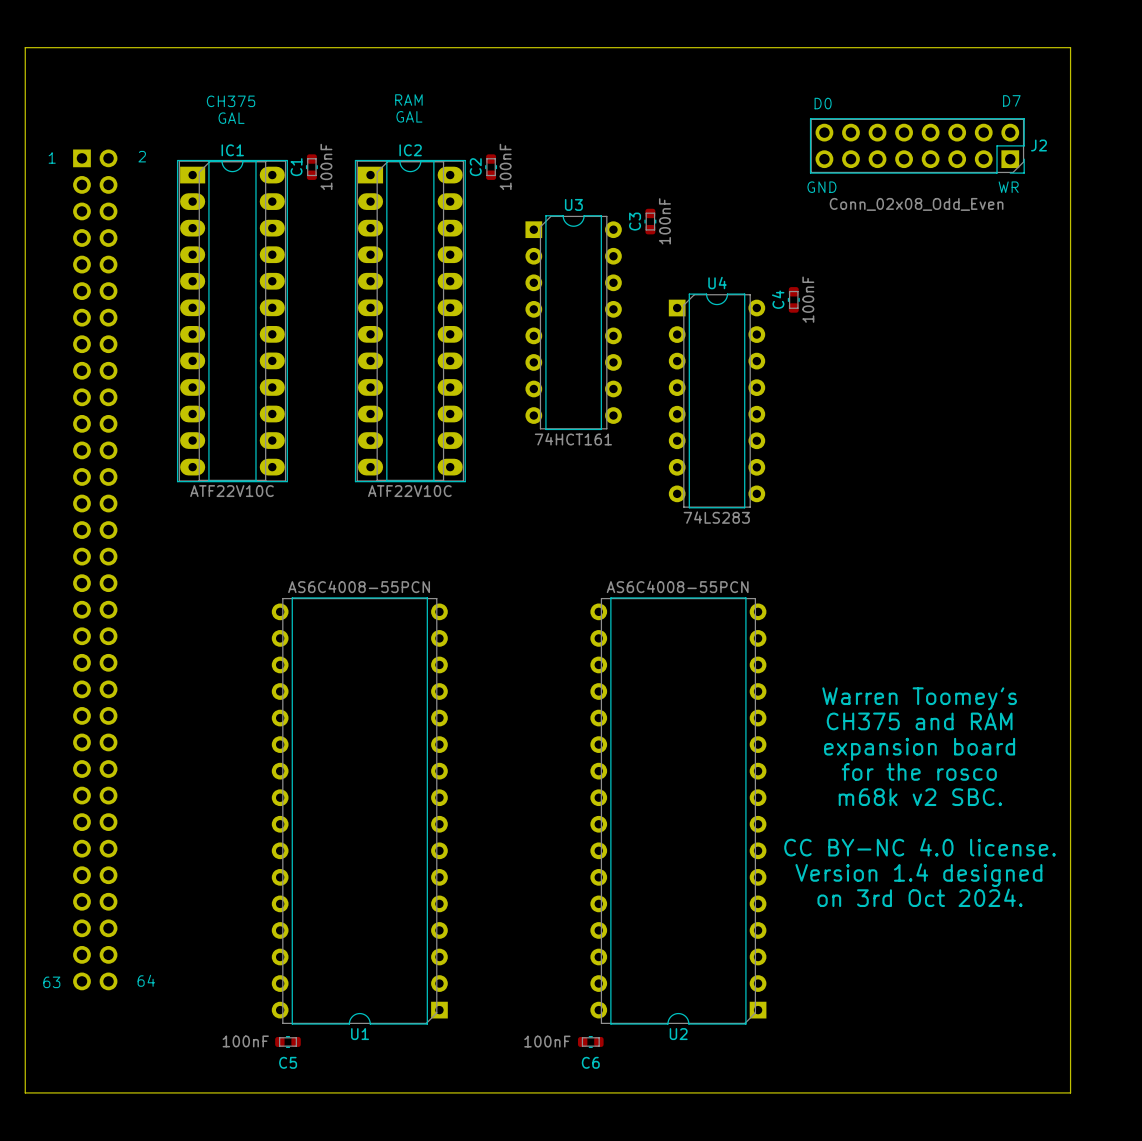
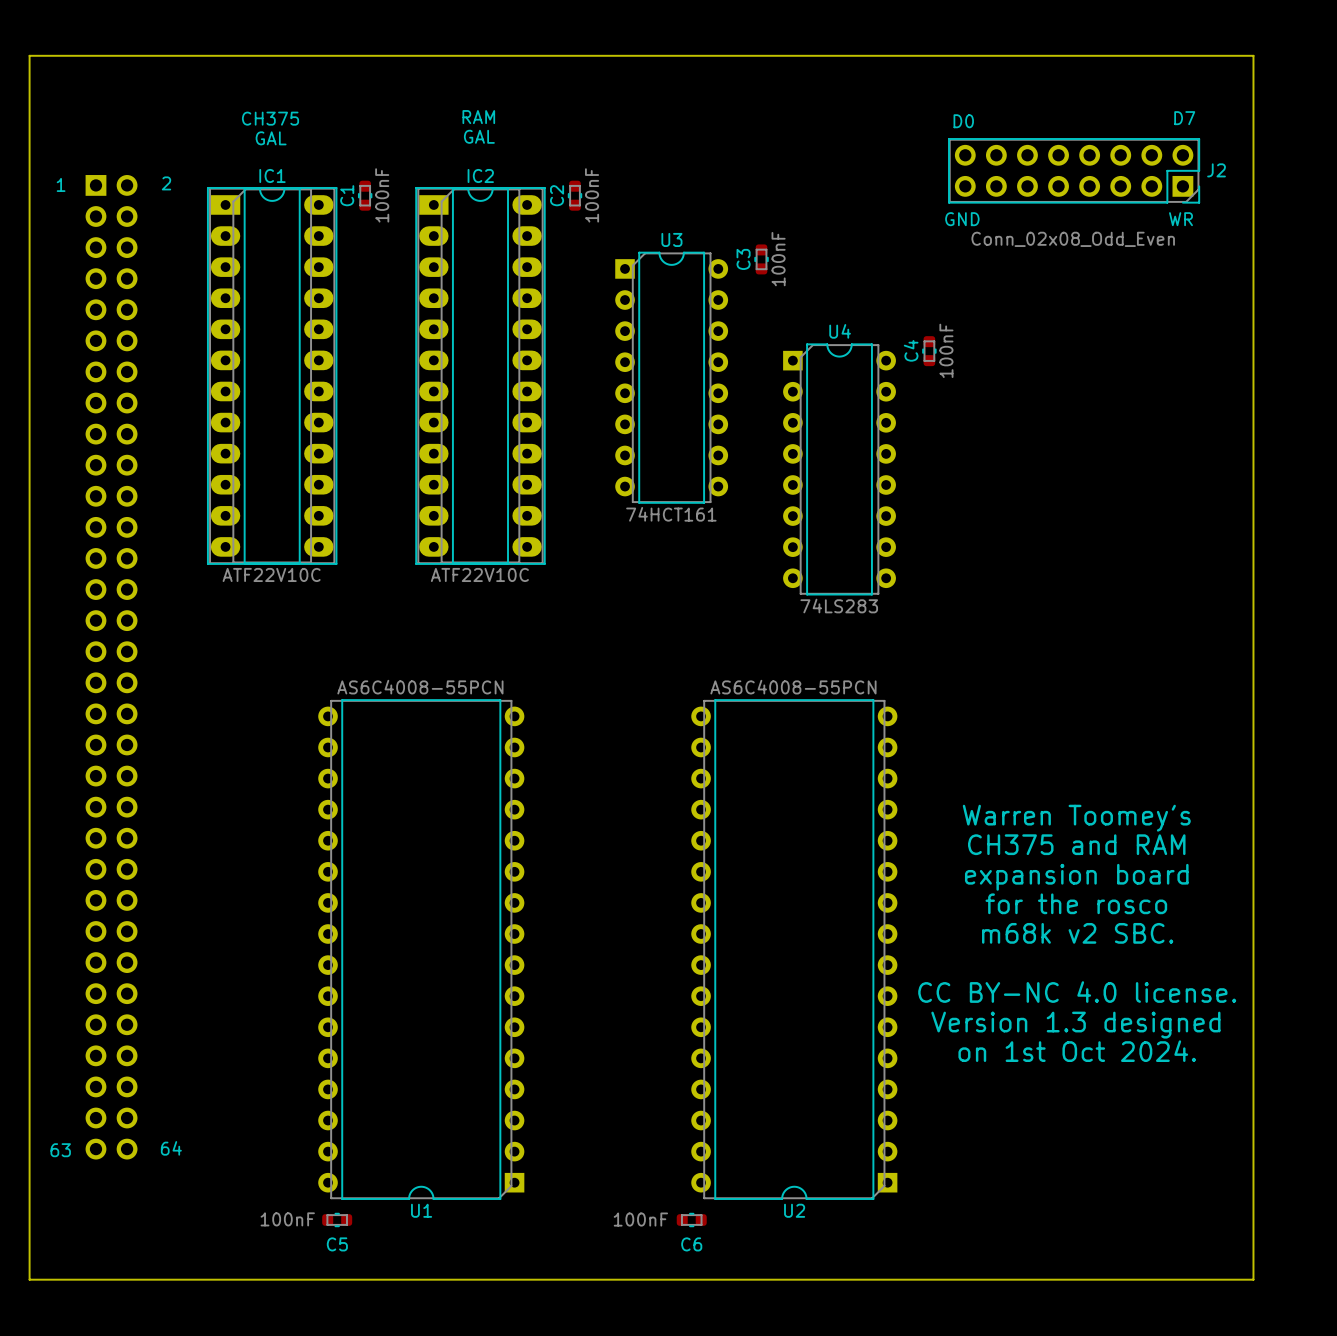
text: Version 1.4 designed (918, 875) -> Version 1.3 designed (1075, 1025)
text: on 3rd Oct 2024. (920, 897) -> on 1st Oct 2024. (1077, 1051)

